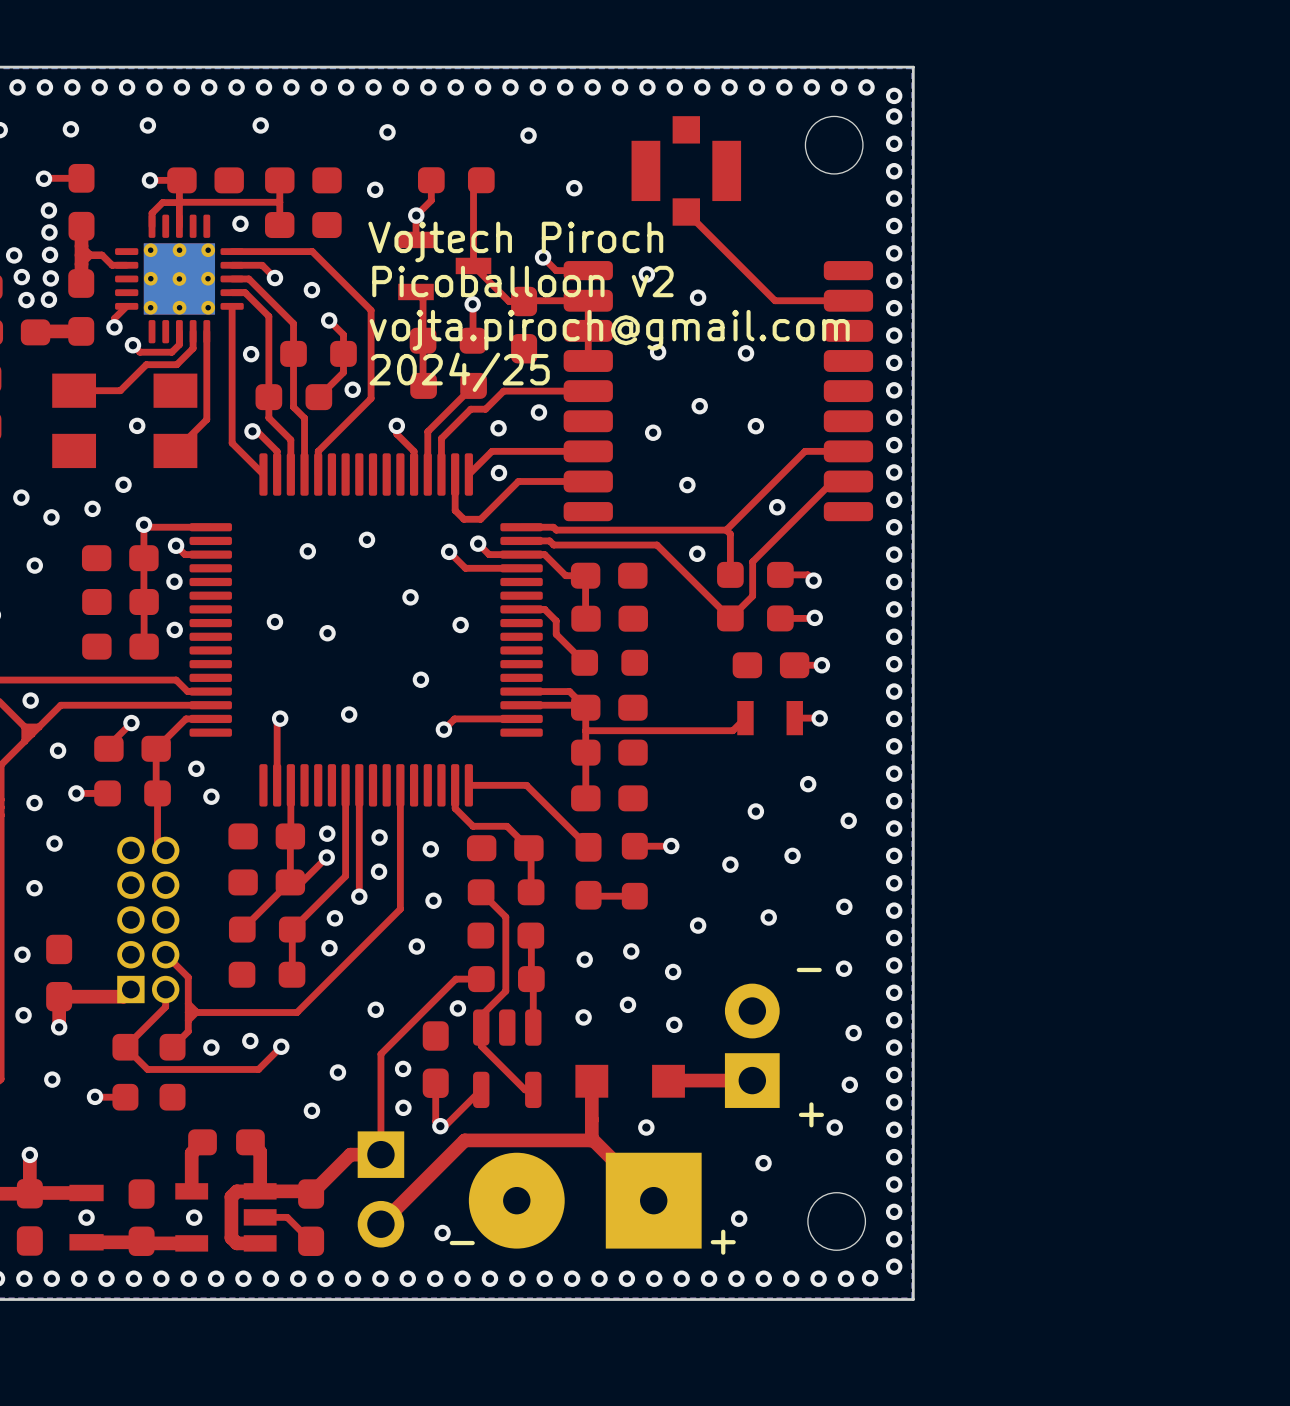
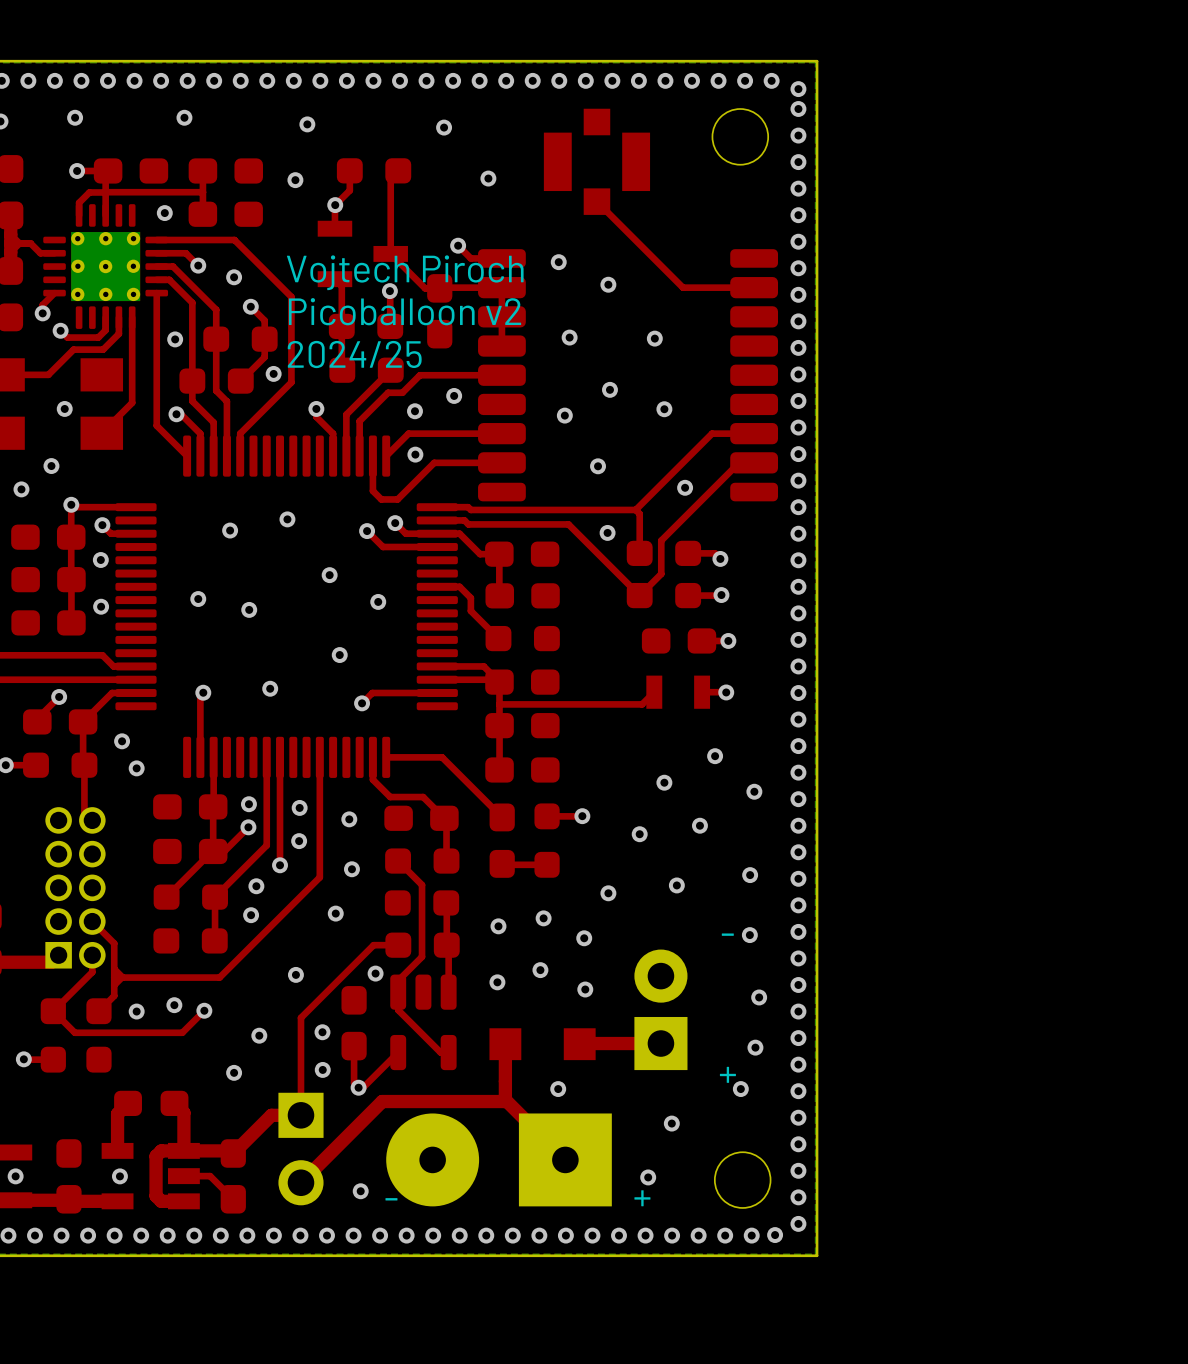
text: Vojtech Piroch (515, 241) -> none
text: Picoballoon v2 (522, 281) -> Vojtech Piroch (405, 272)
text: vojta.piroch@gmail.com (609, 330) -> Picoballoon v2 (405, 311)

